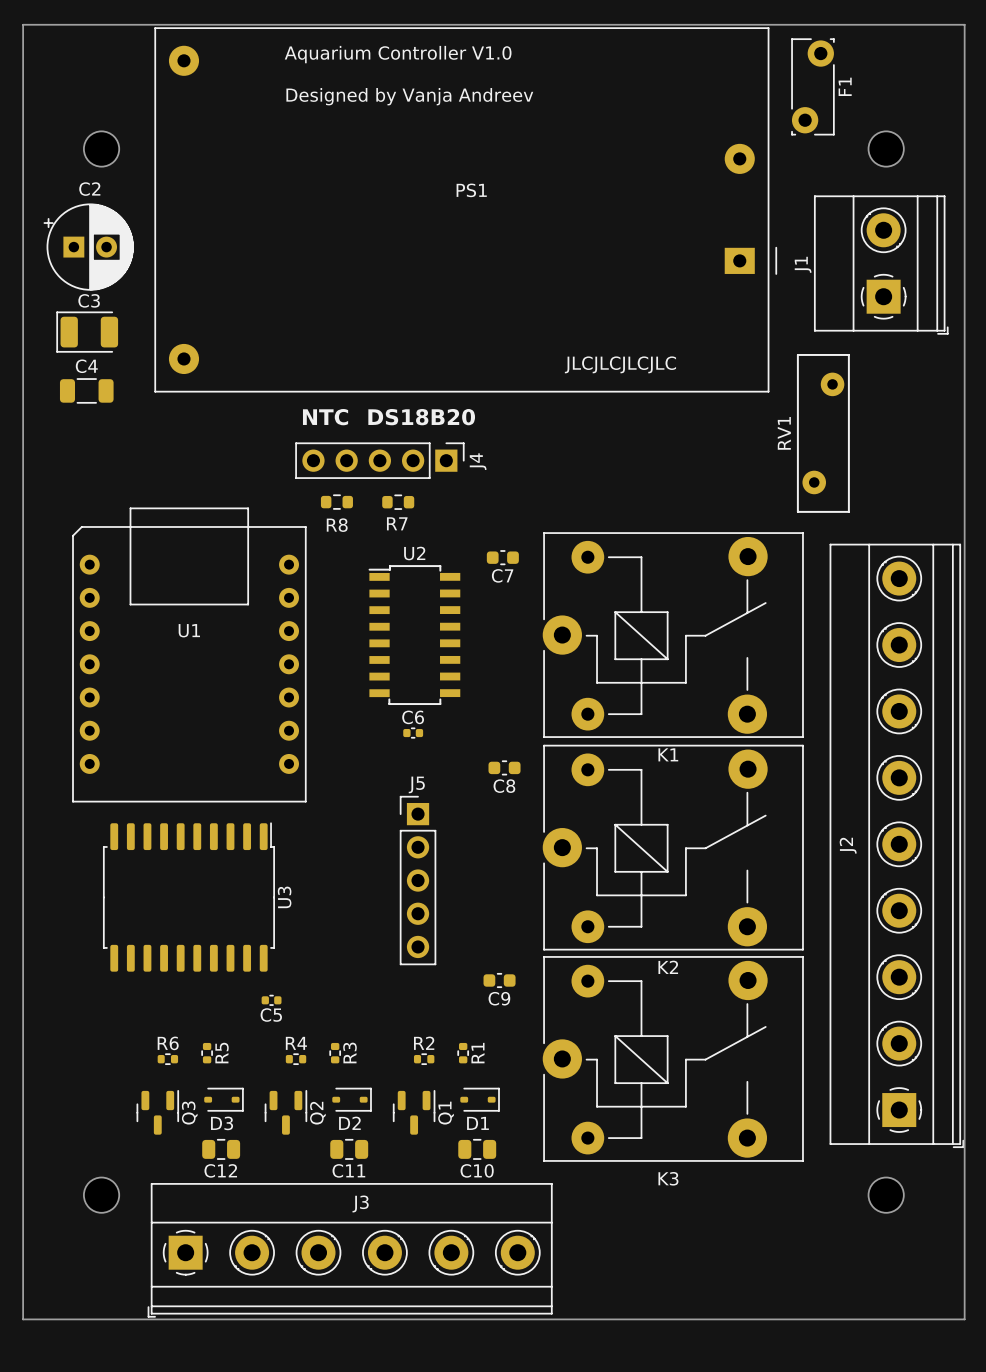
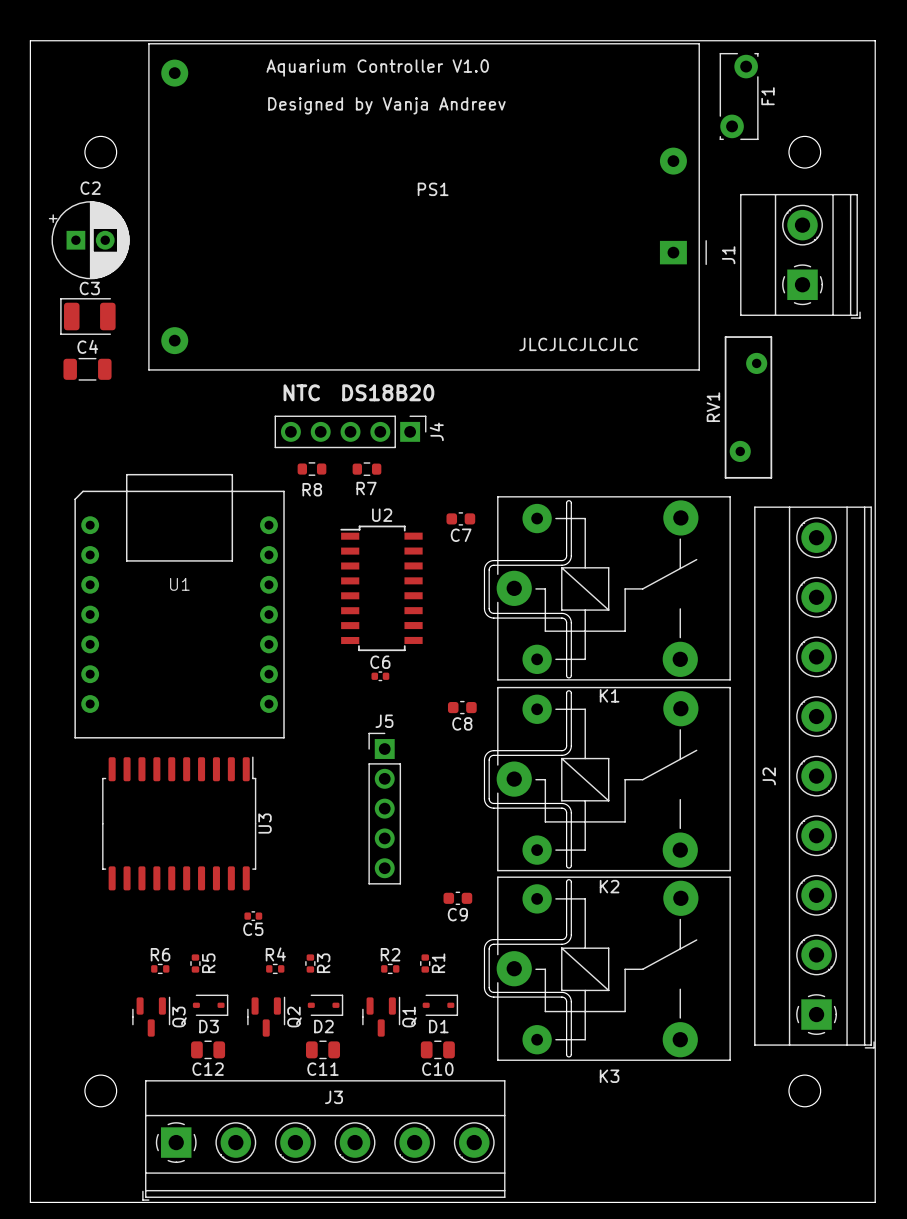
board edge: none -> (566, 503) (565, 558) (561, 560) (489, 561) (484, 568) (484, 608) (486, 614) (492, 617) (564, 619) (566, 622) (566, 675) (568, 677) (571, 675) (571, 622) (567, 615) (561, 613) (493, 613) (489, 608) (489, 569) (491, 565) (561, 565) (569, 561) (571, 555) (571, 503) (568, 500) (566, 503)
board edge: none -> (566, 693) (565, 748) (561, 750) (489, 751) (484, 758) (484, 798) (486, 804) (492, 808) (564, 809) (566, 812) (566, 865) (568, 867) (571, 865) (571, 812) (567, 805) (561, 803) (493, 803) (489, 798) (489, 760) (491, 756) (561, 755) (569, 751) (571, 745) (571, 693) (568, 690) (566, 693)
board edge: none -> (566, 882) (565, 937) (561, 939) (489, 940) (484, 947) (484, 987) (487, 994) (492, 996) (564, 998) (566, 1001) (566, 1054) (568, 1056) (571, 1054) (571, 1001) (567, 994) (561, 992) (493, 992) (489, 987) (489, 948) (491, 944) (561, 944) (569, 940) (571, 934) (571, 882) (568, 879) (566, 882)

